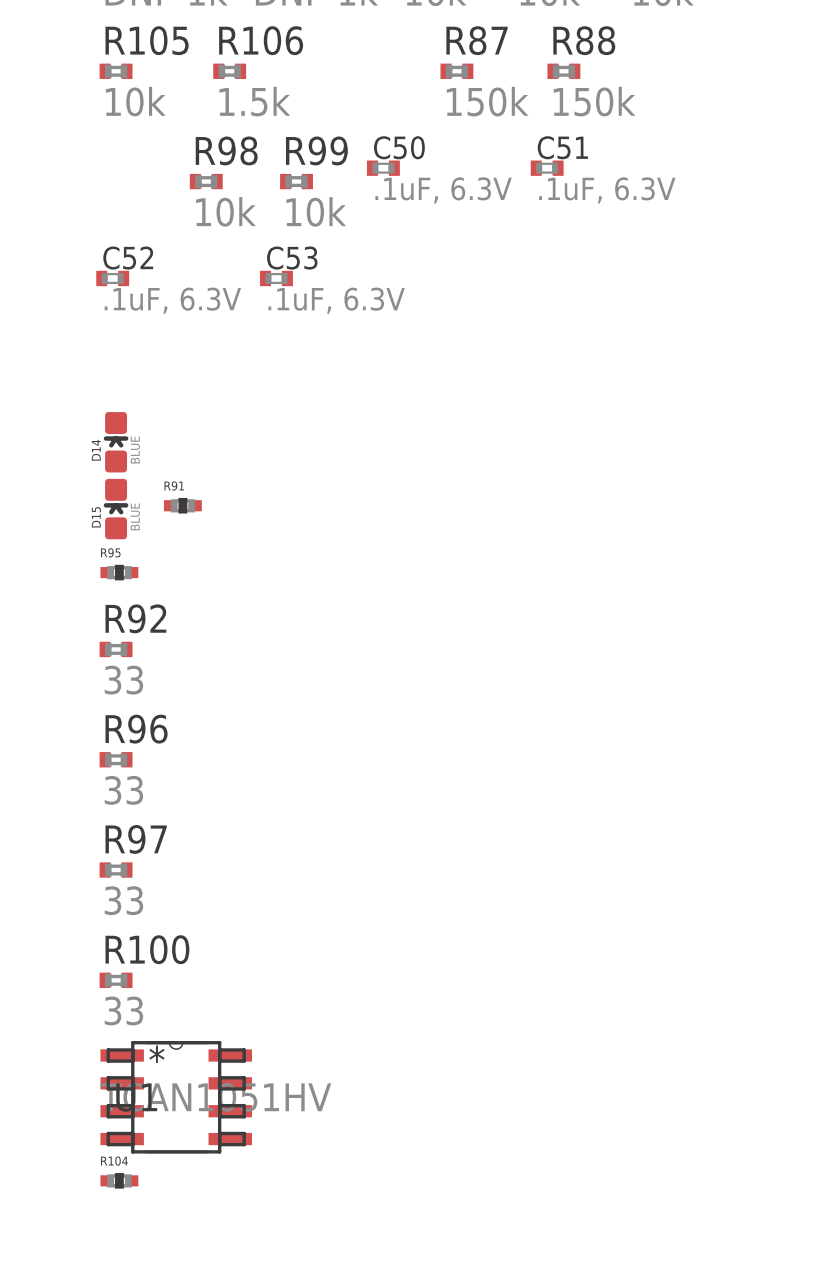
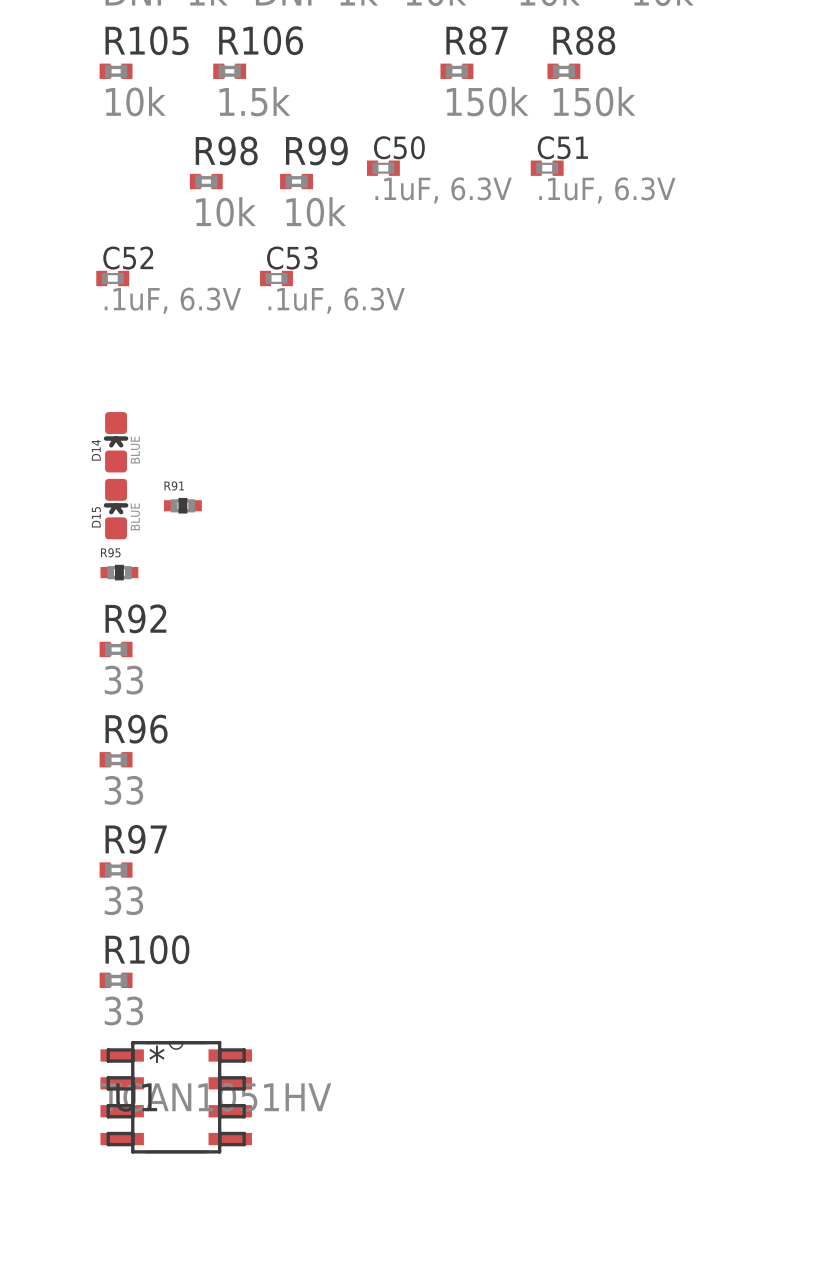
R104: (119, 1180) -> none

